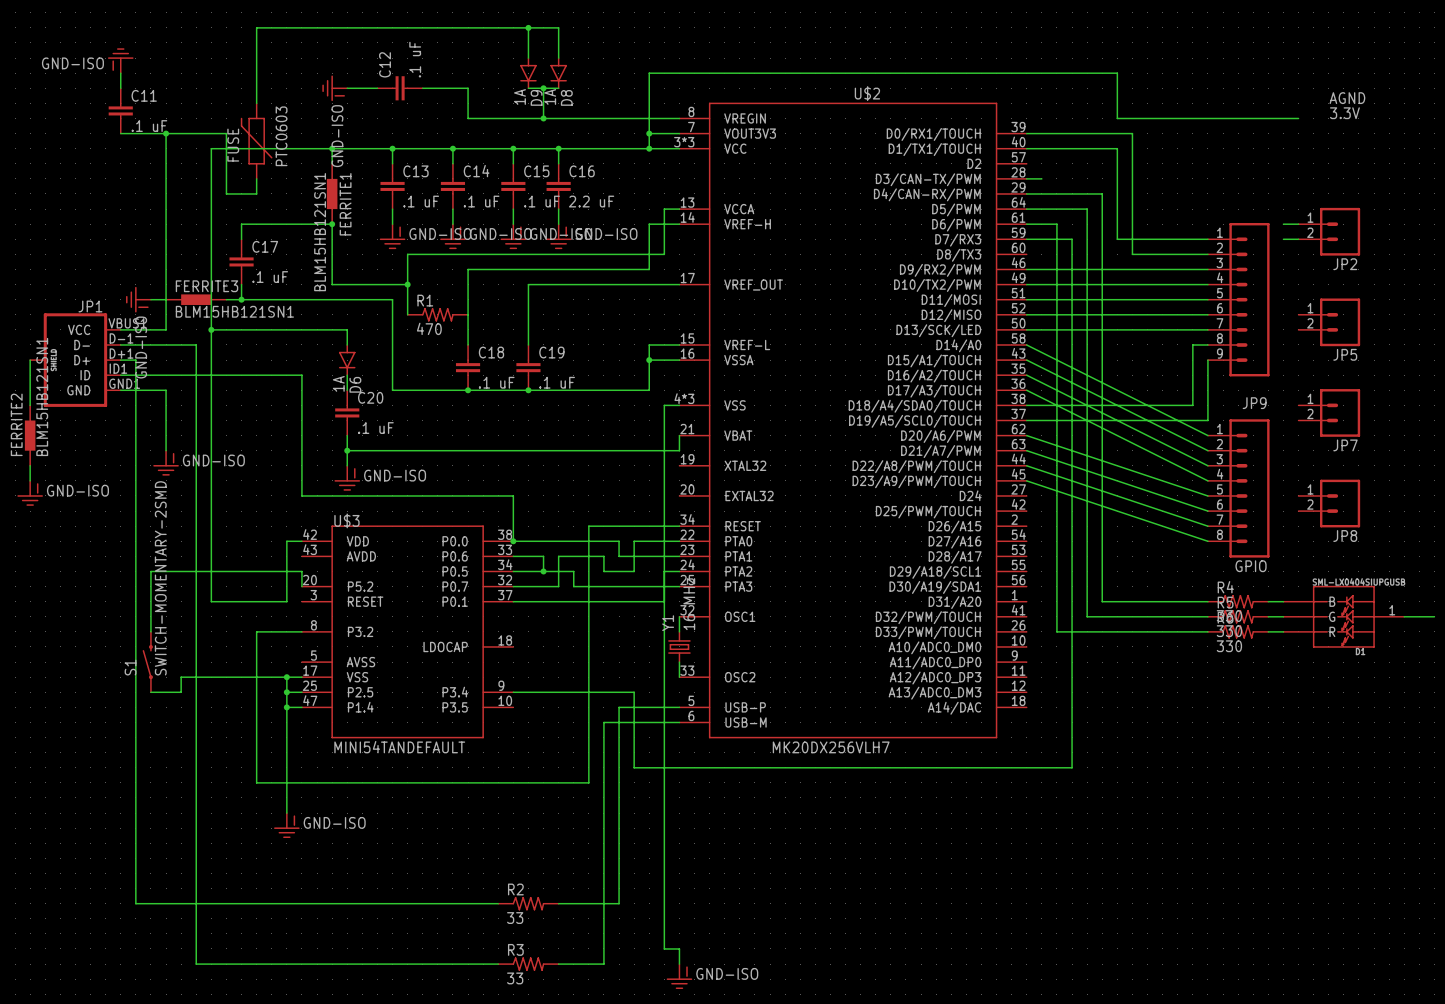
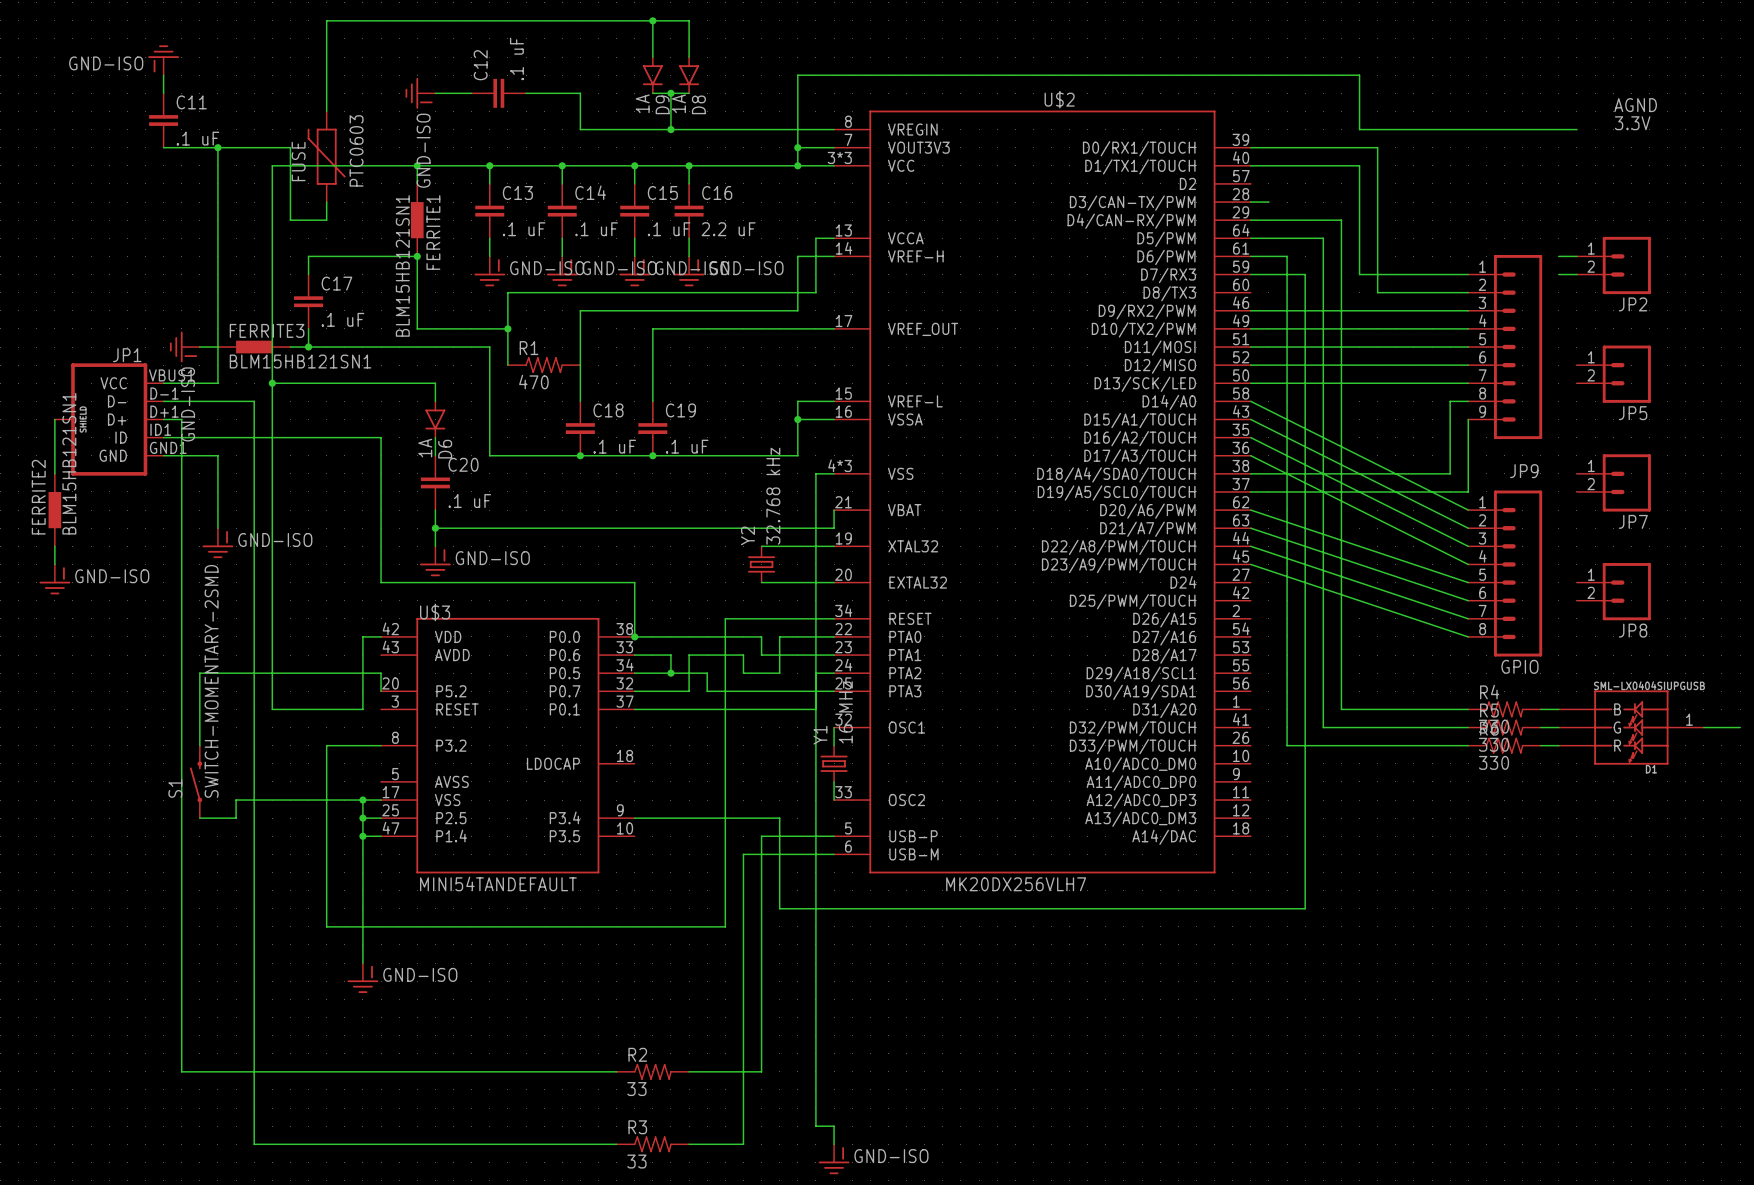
wire: none -> (761, 546) (834, 546)
Y2: none -> 32.768 kHz (761, 564)
wire: none -> (761, 582) (834, 582)

